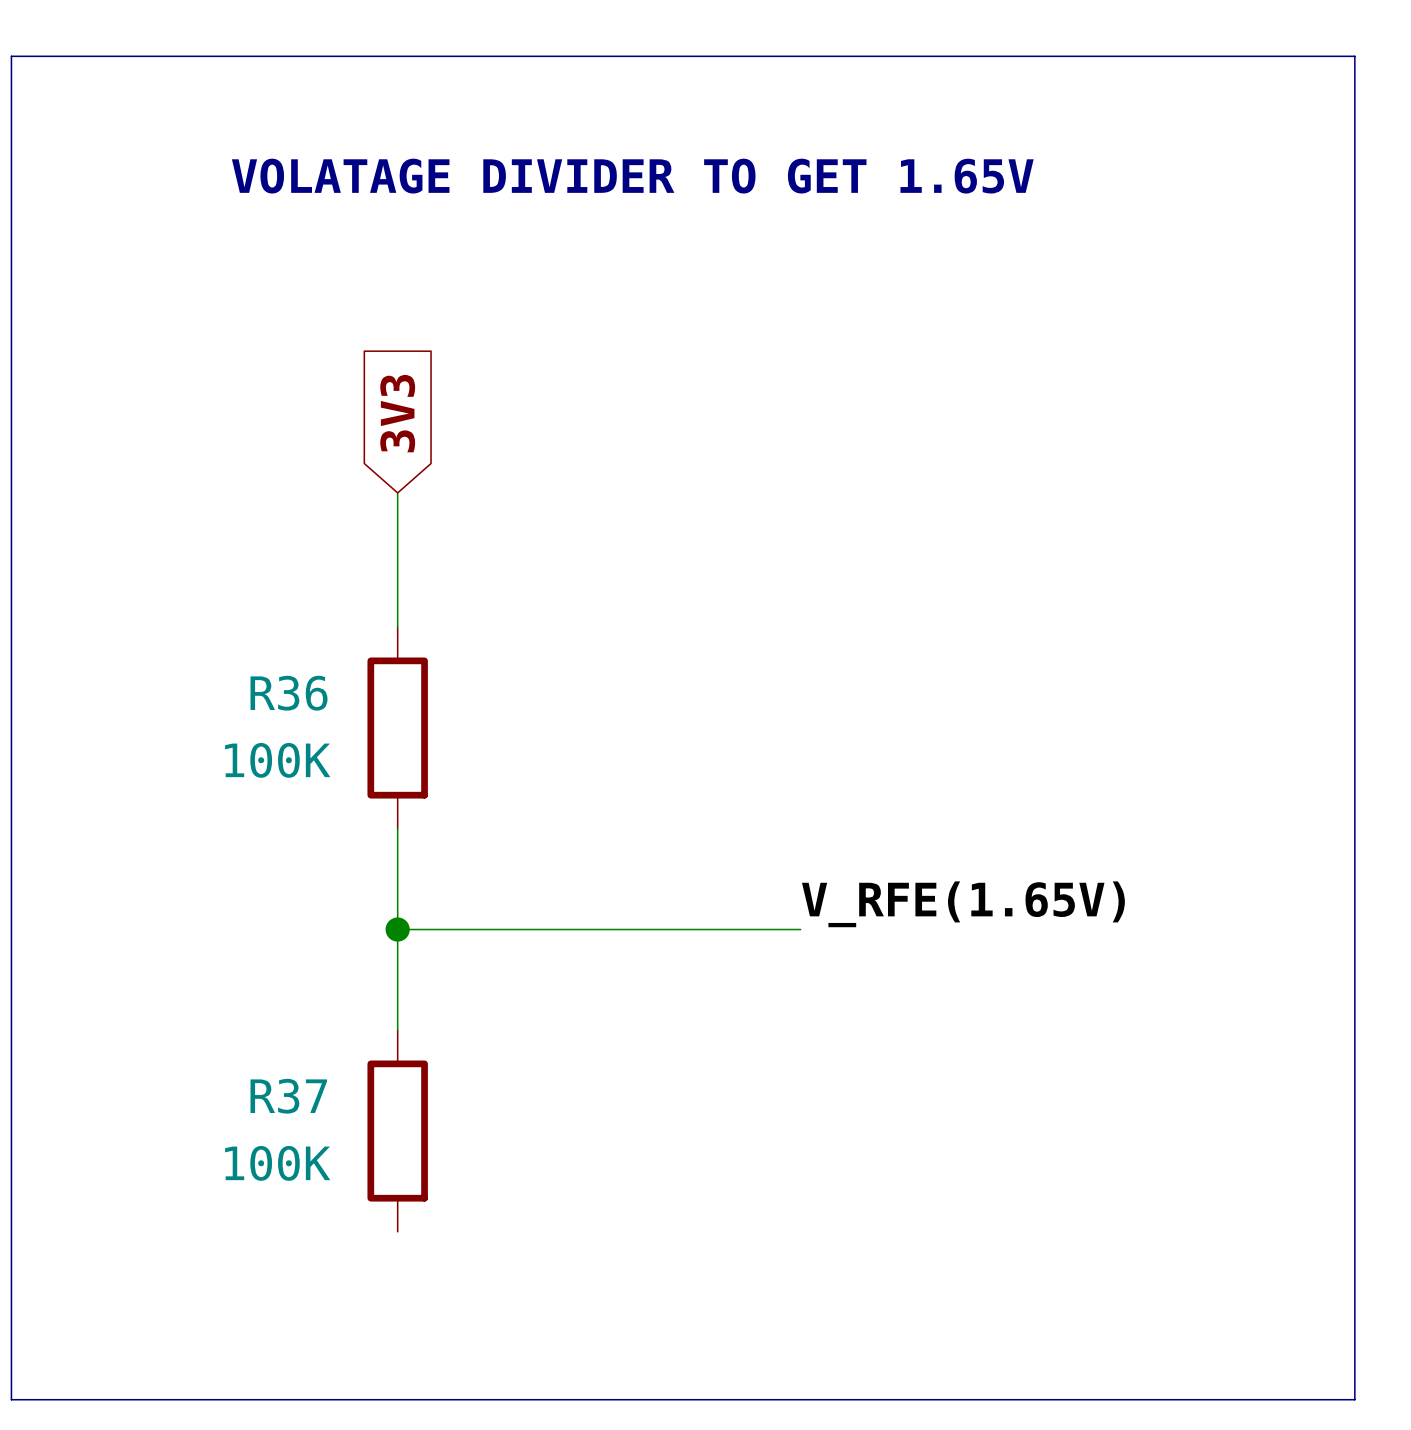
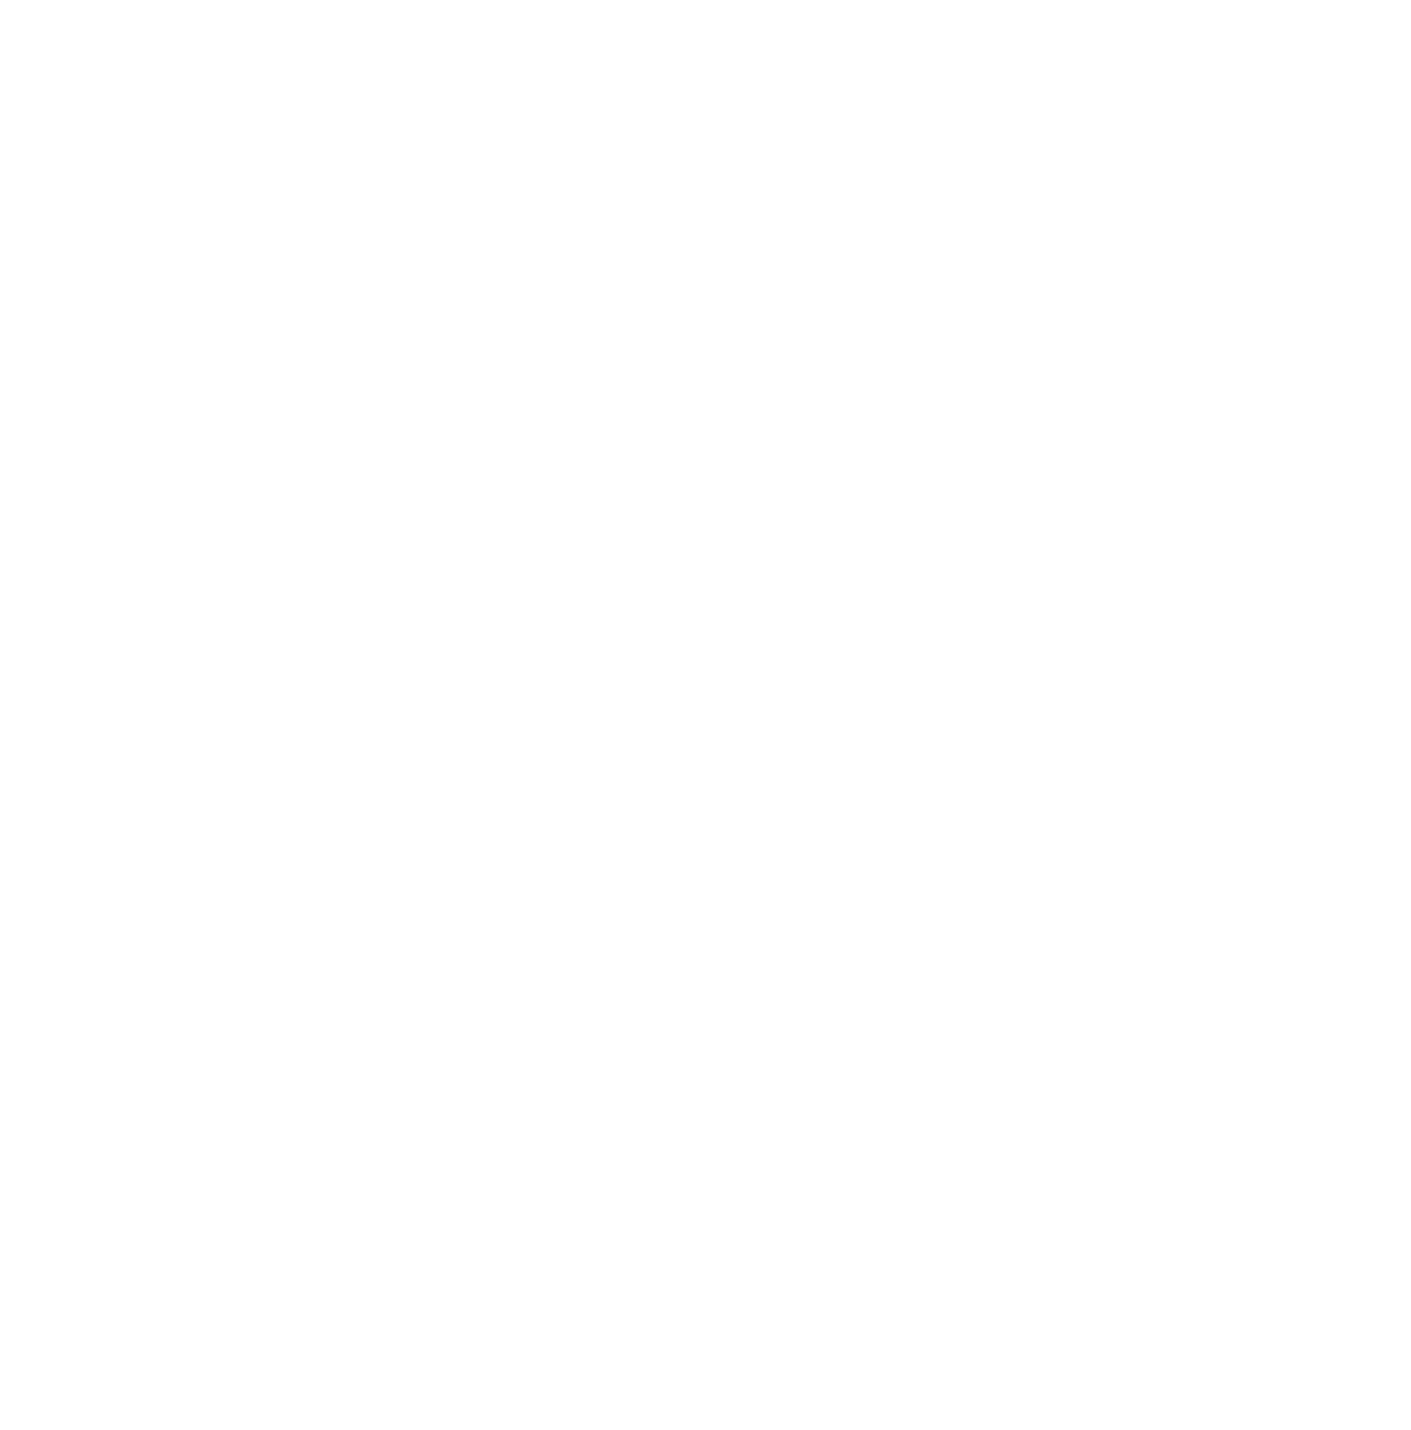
line: (11, 56) (1354, 56) (1354, 1399) (11, 1399) (11, 56) -> none
text: VOLATAGE DIVIDER TO GET 1.65V (632, 176) -> none
global label: 3V3 (397, 413) -> none
wire: (397, 492) (397, 627) -> none
R36: 100K (397, 728) -> none
wire: (397, 828) (397, 1030) -> none
label: V_RFE(1.65V) (963, 904) -> none
wire: (397, 929) (800, 929) -> none
junction: (397, 929) -> none
R37: 100K (397, 1131) -> none

